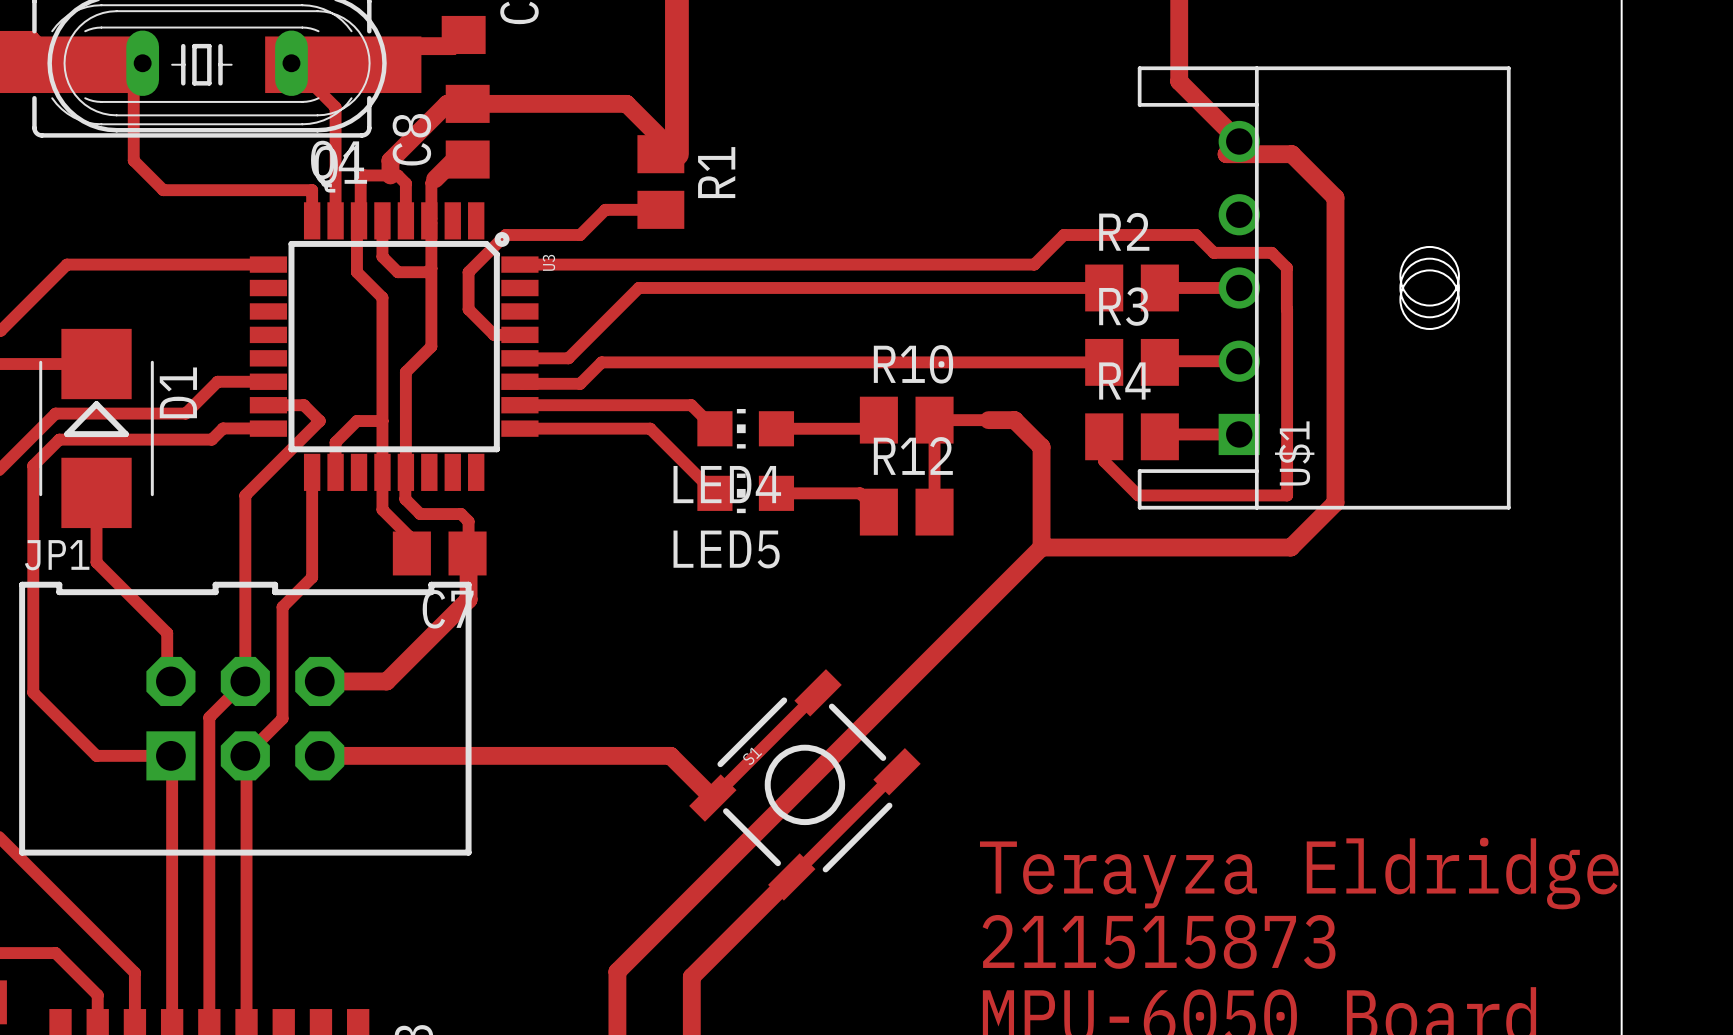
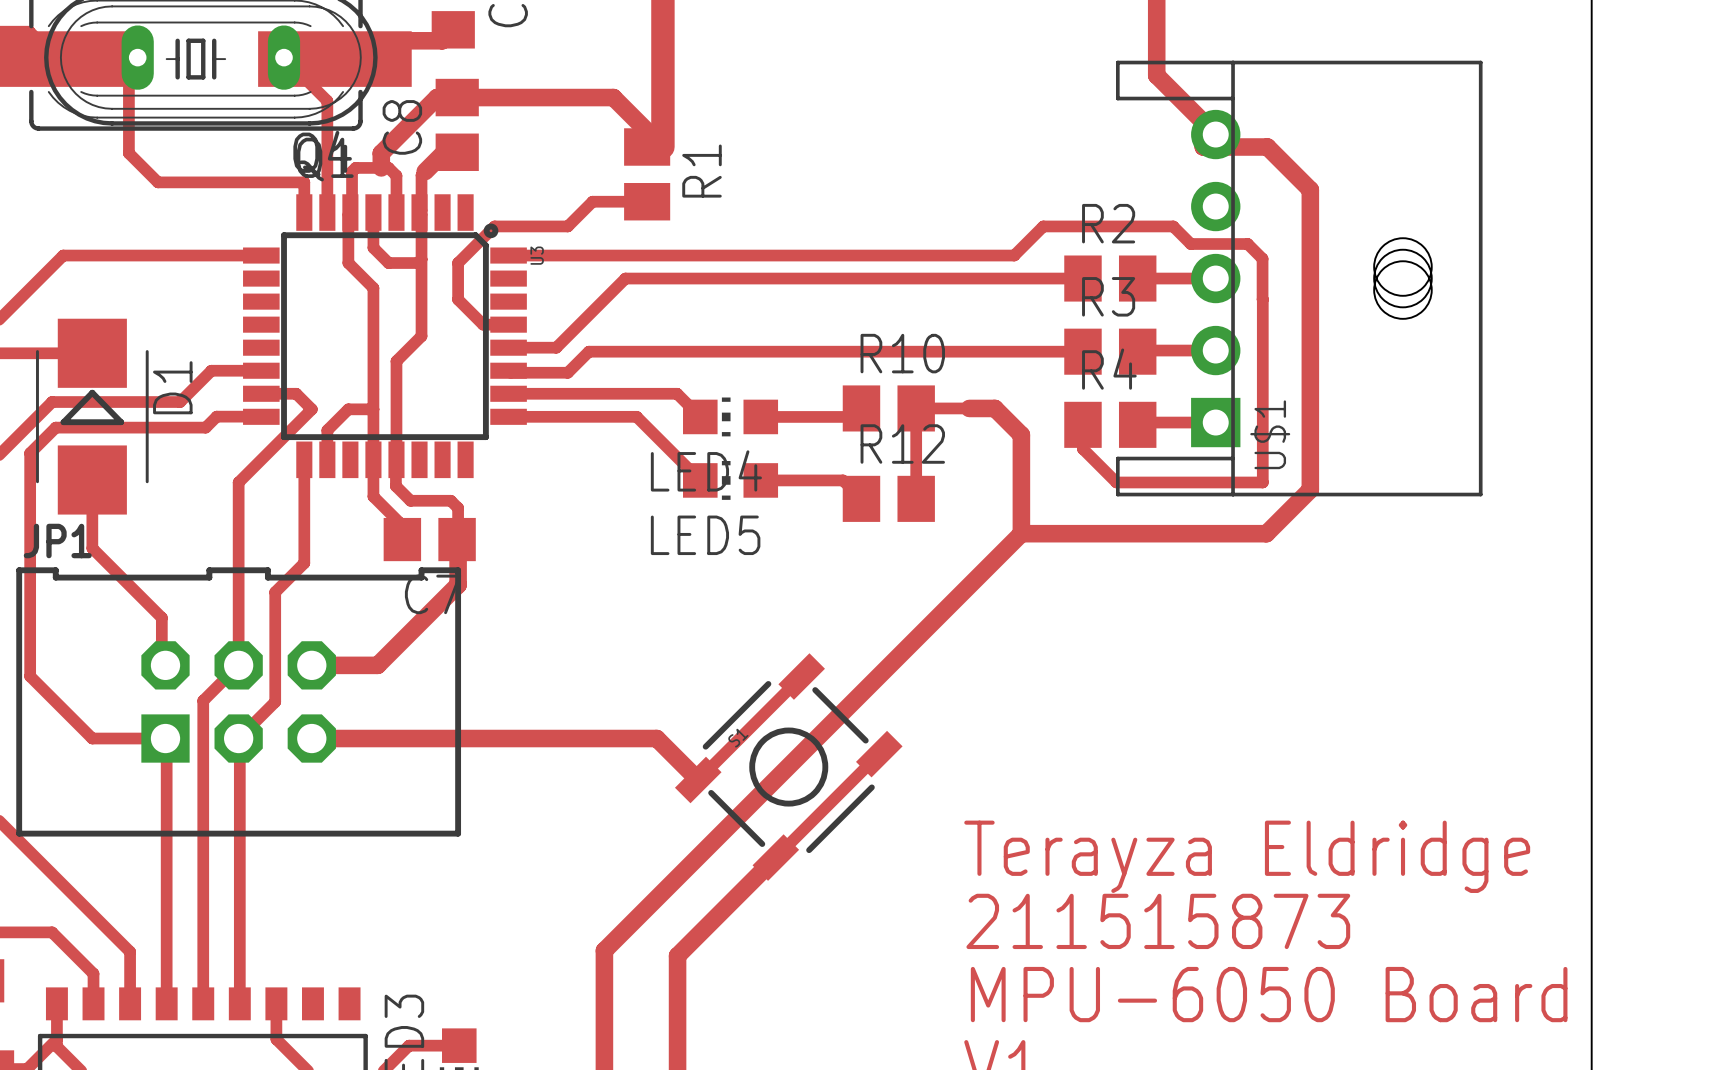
U$1 footprint: [1137, 66, 1511, 510] -> [1116, 60, 1483, 497]

